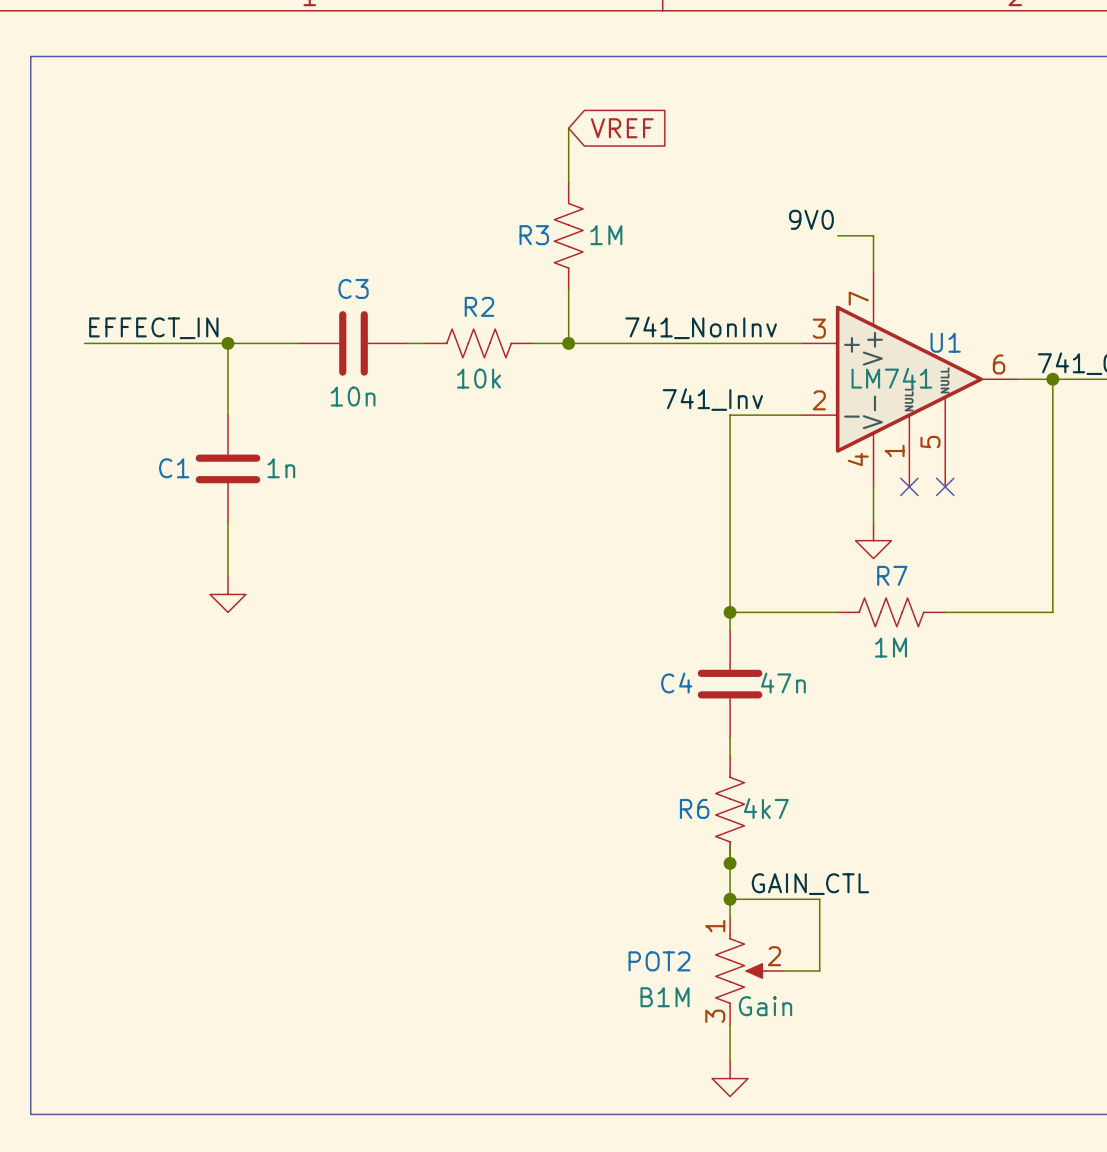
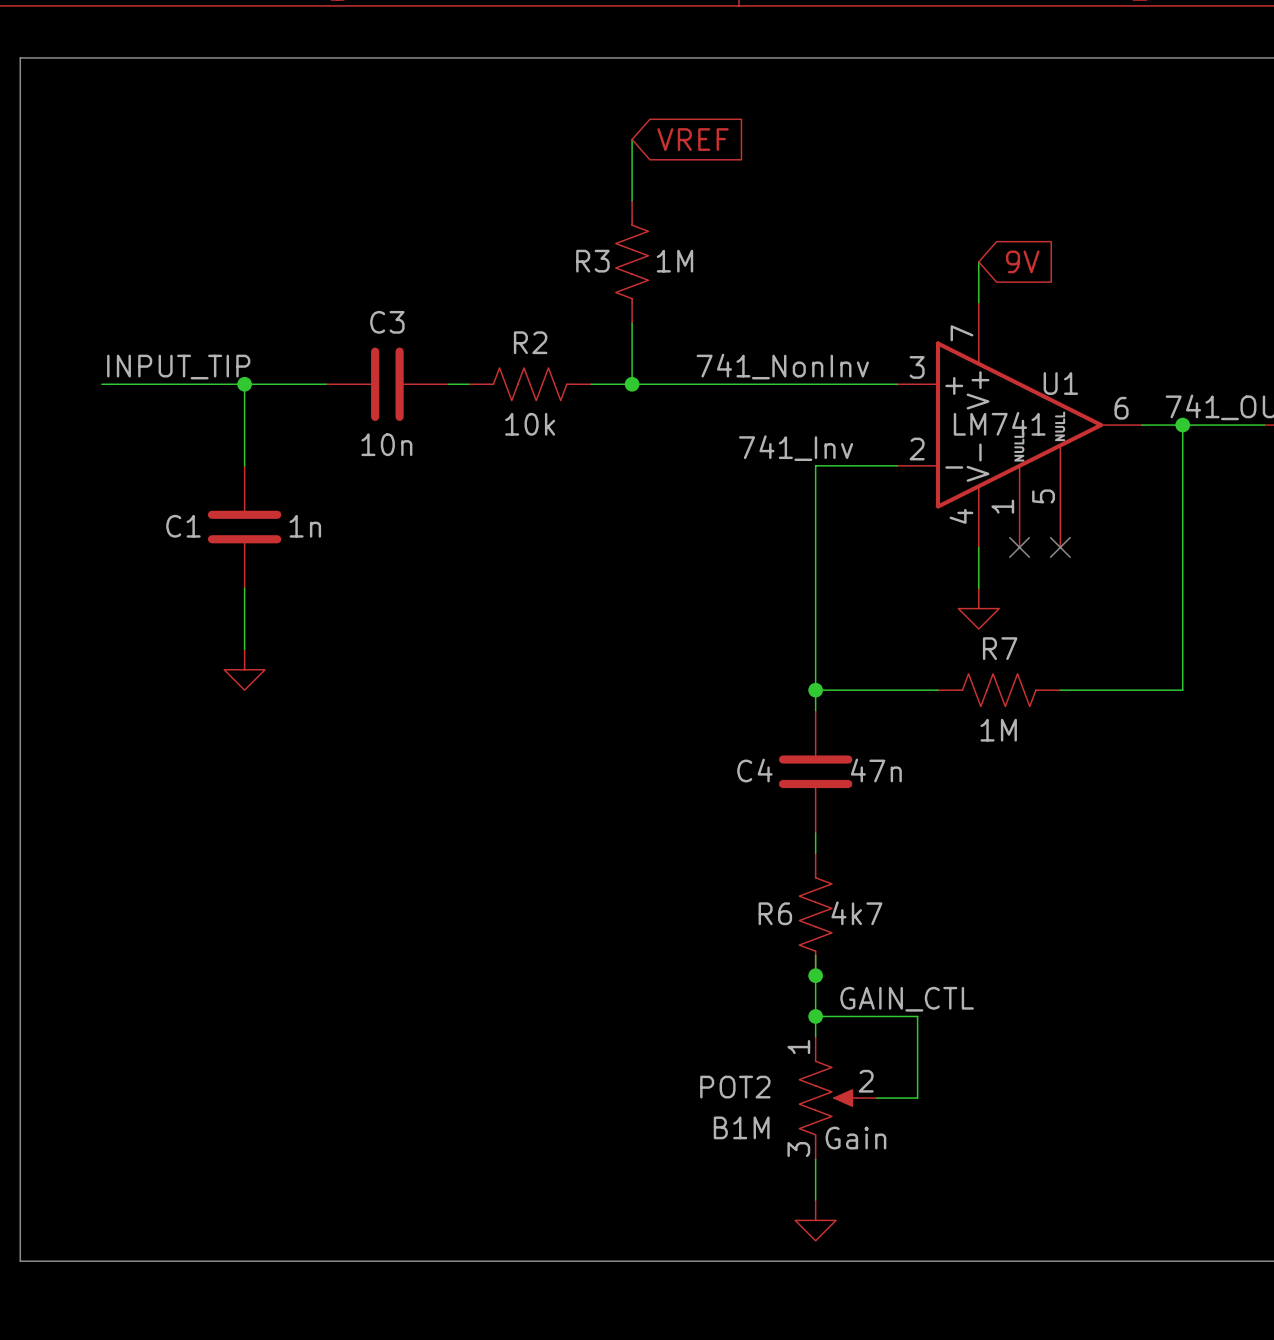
label: 9V0 (811, 219) -> none
wire: (837, 235) (873, 235) -> none
global label: none -> 9V (1022, 261)
label: EFFECT_IN (153, 328) -> none
label: none -> INPUT_TIP (178, 367)
wire: (84, 343) (102, 343) -> none

